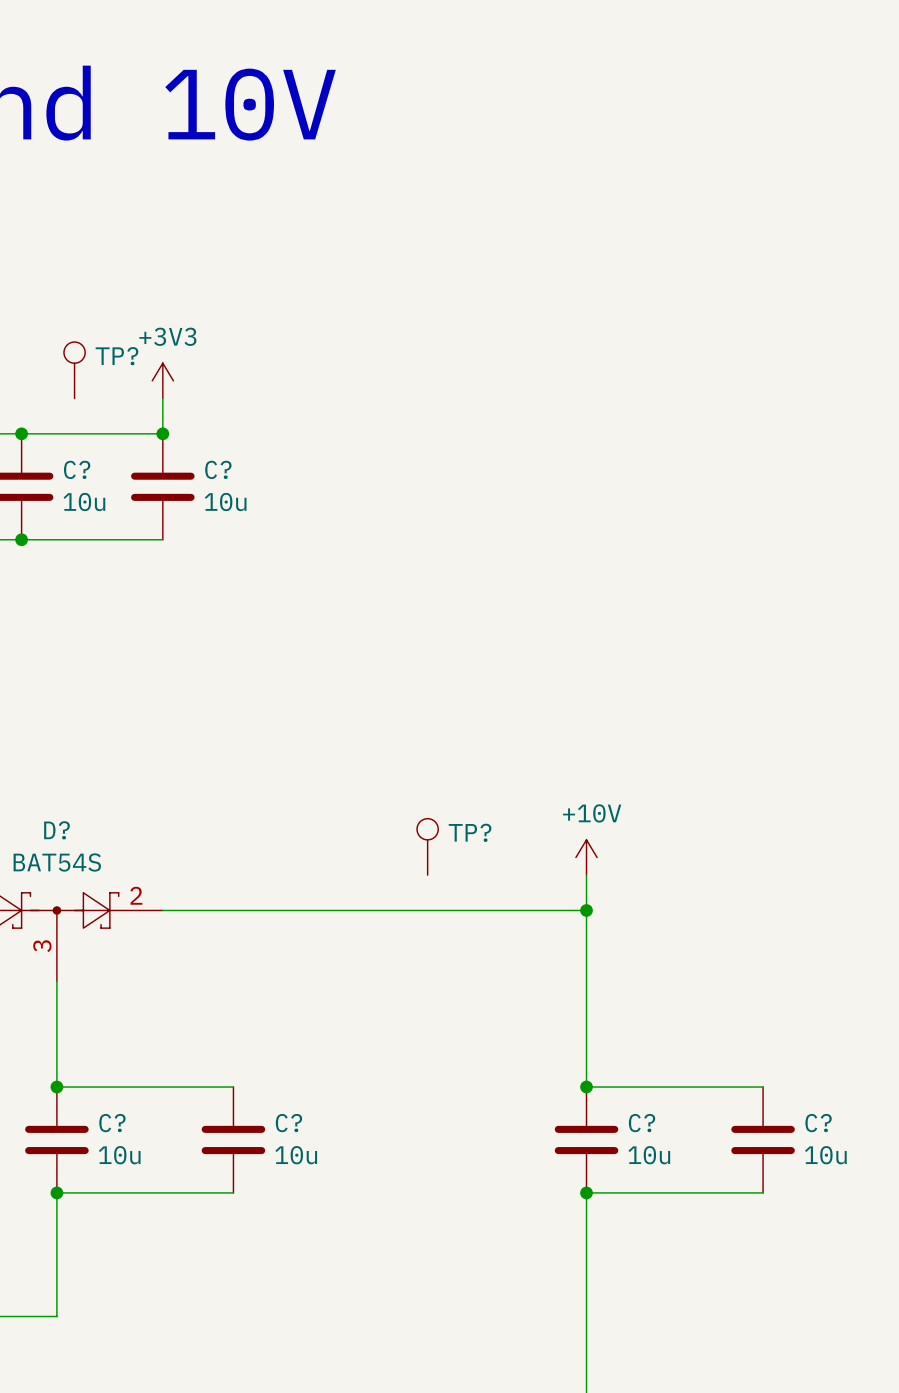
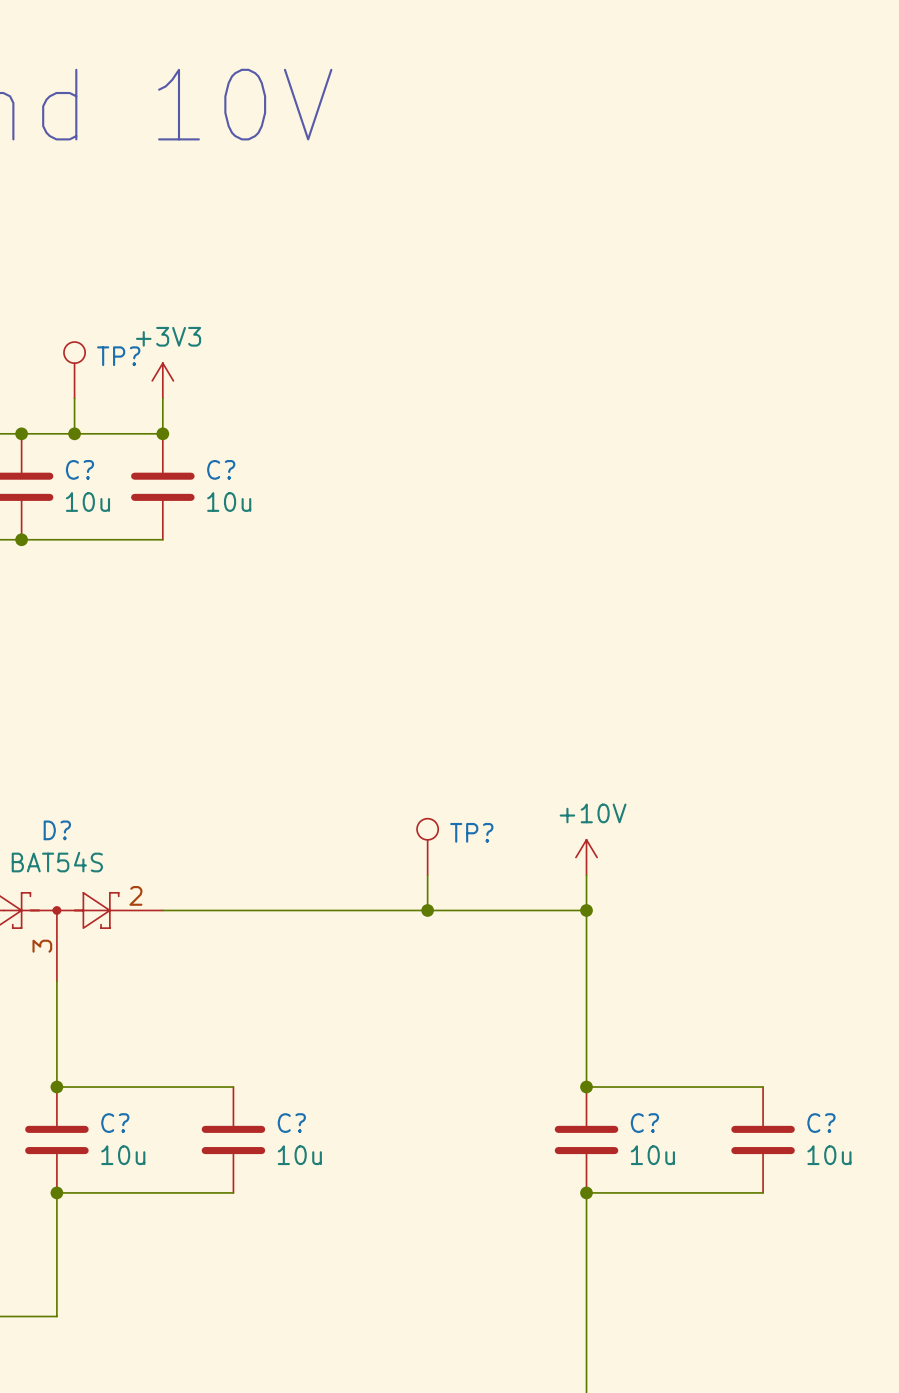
wire: none -> (74, 398) (74, 433)
junction: none -> (74, 433)
wire: none -> (427, 875) (427, 910)
junction: none -> (427, 910)

